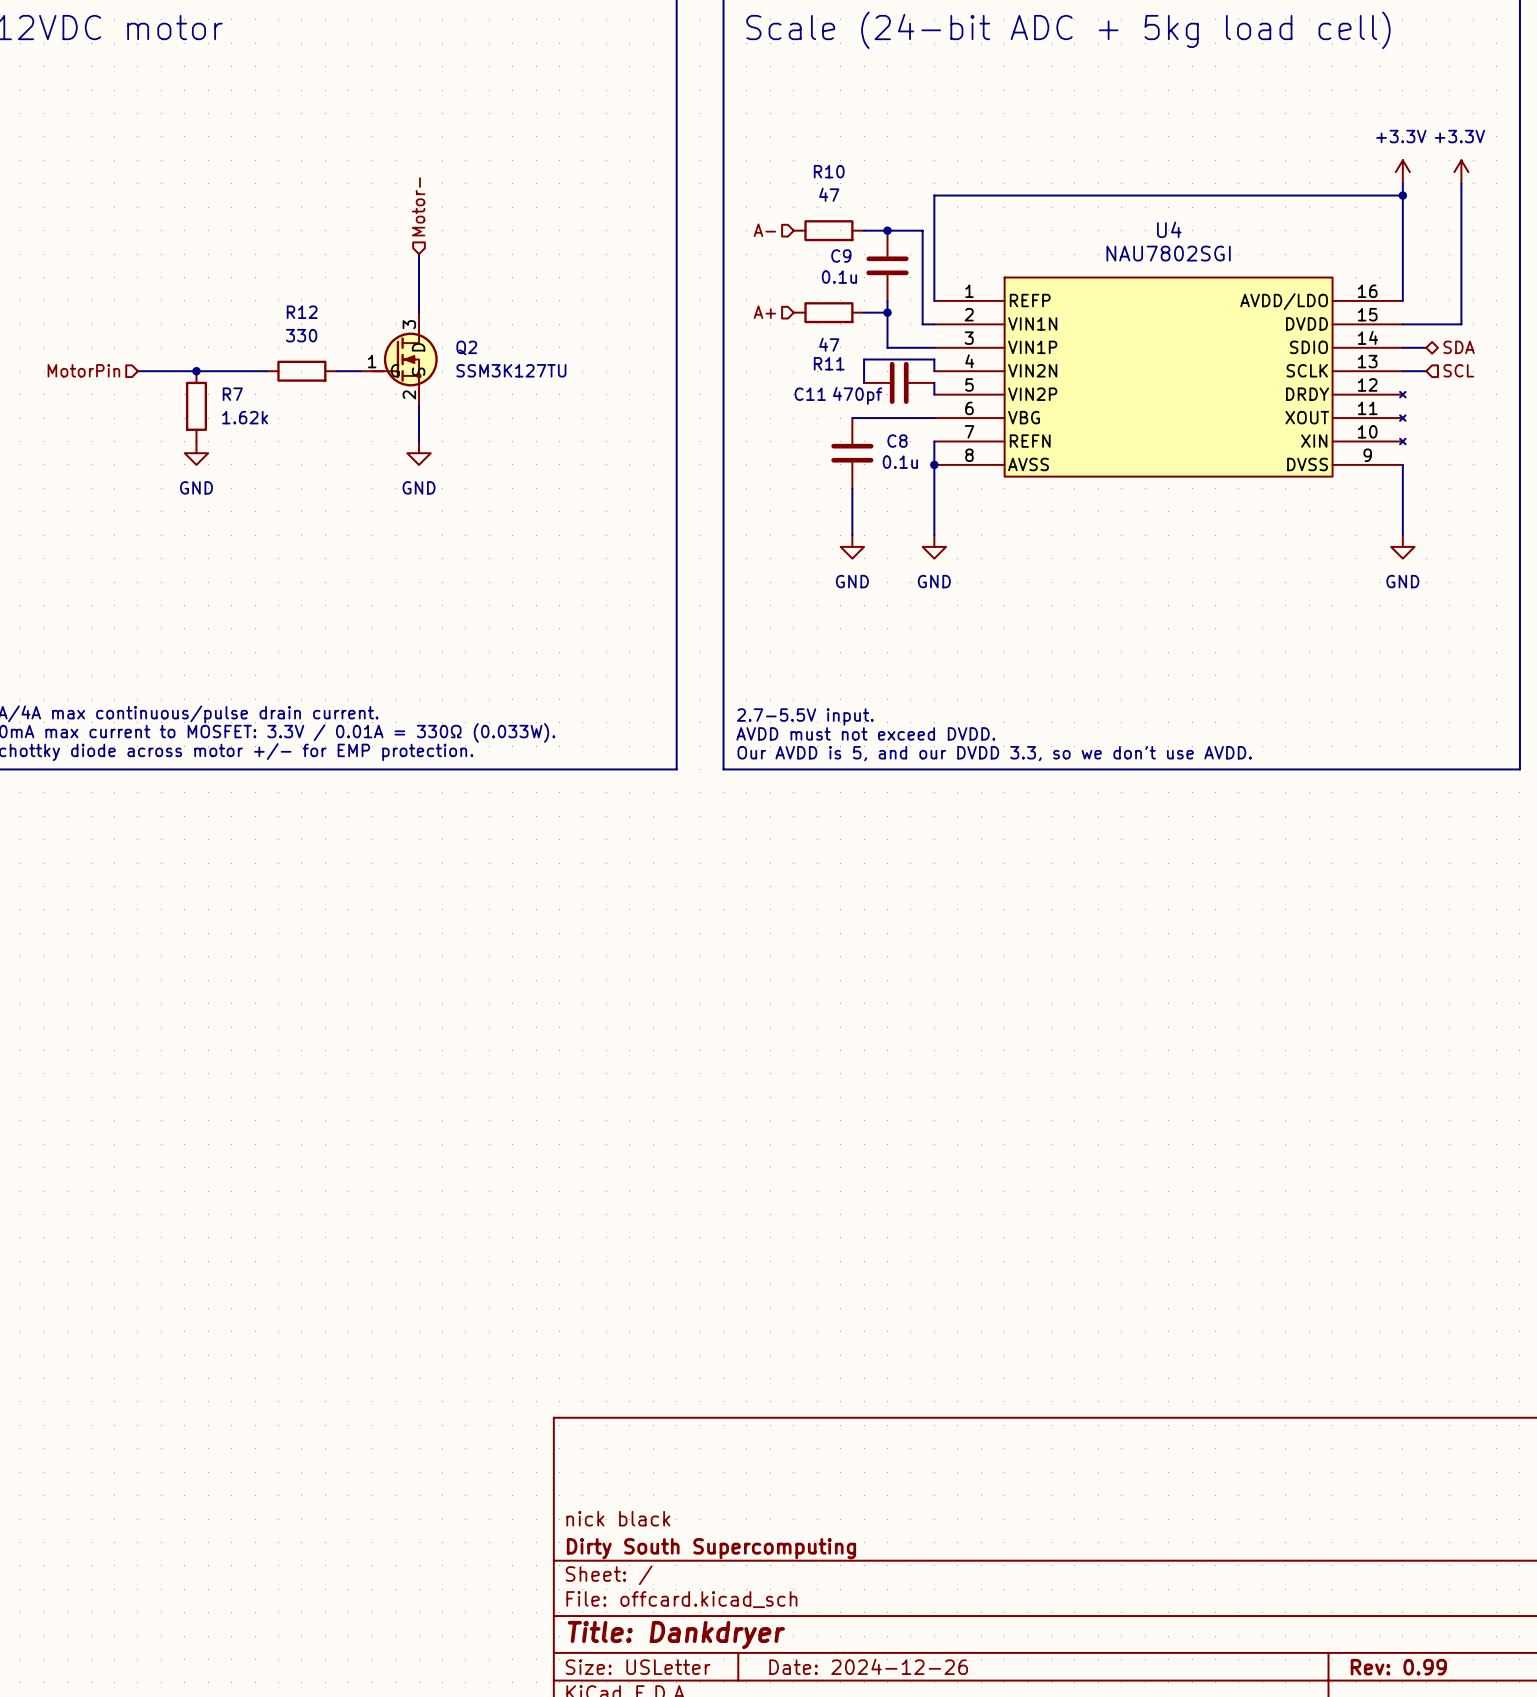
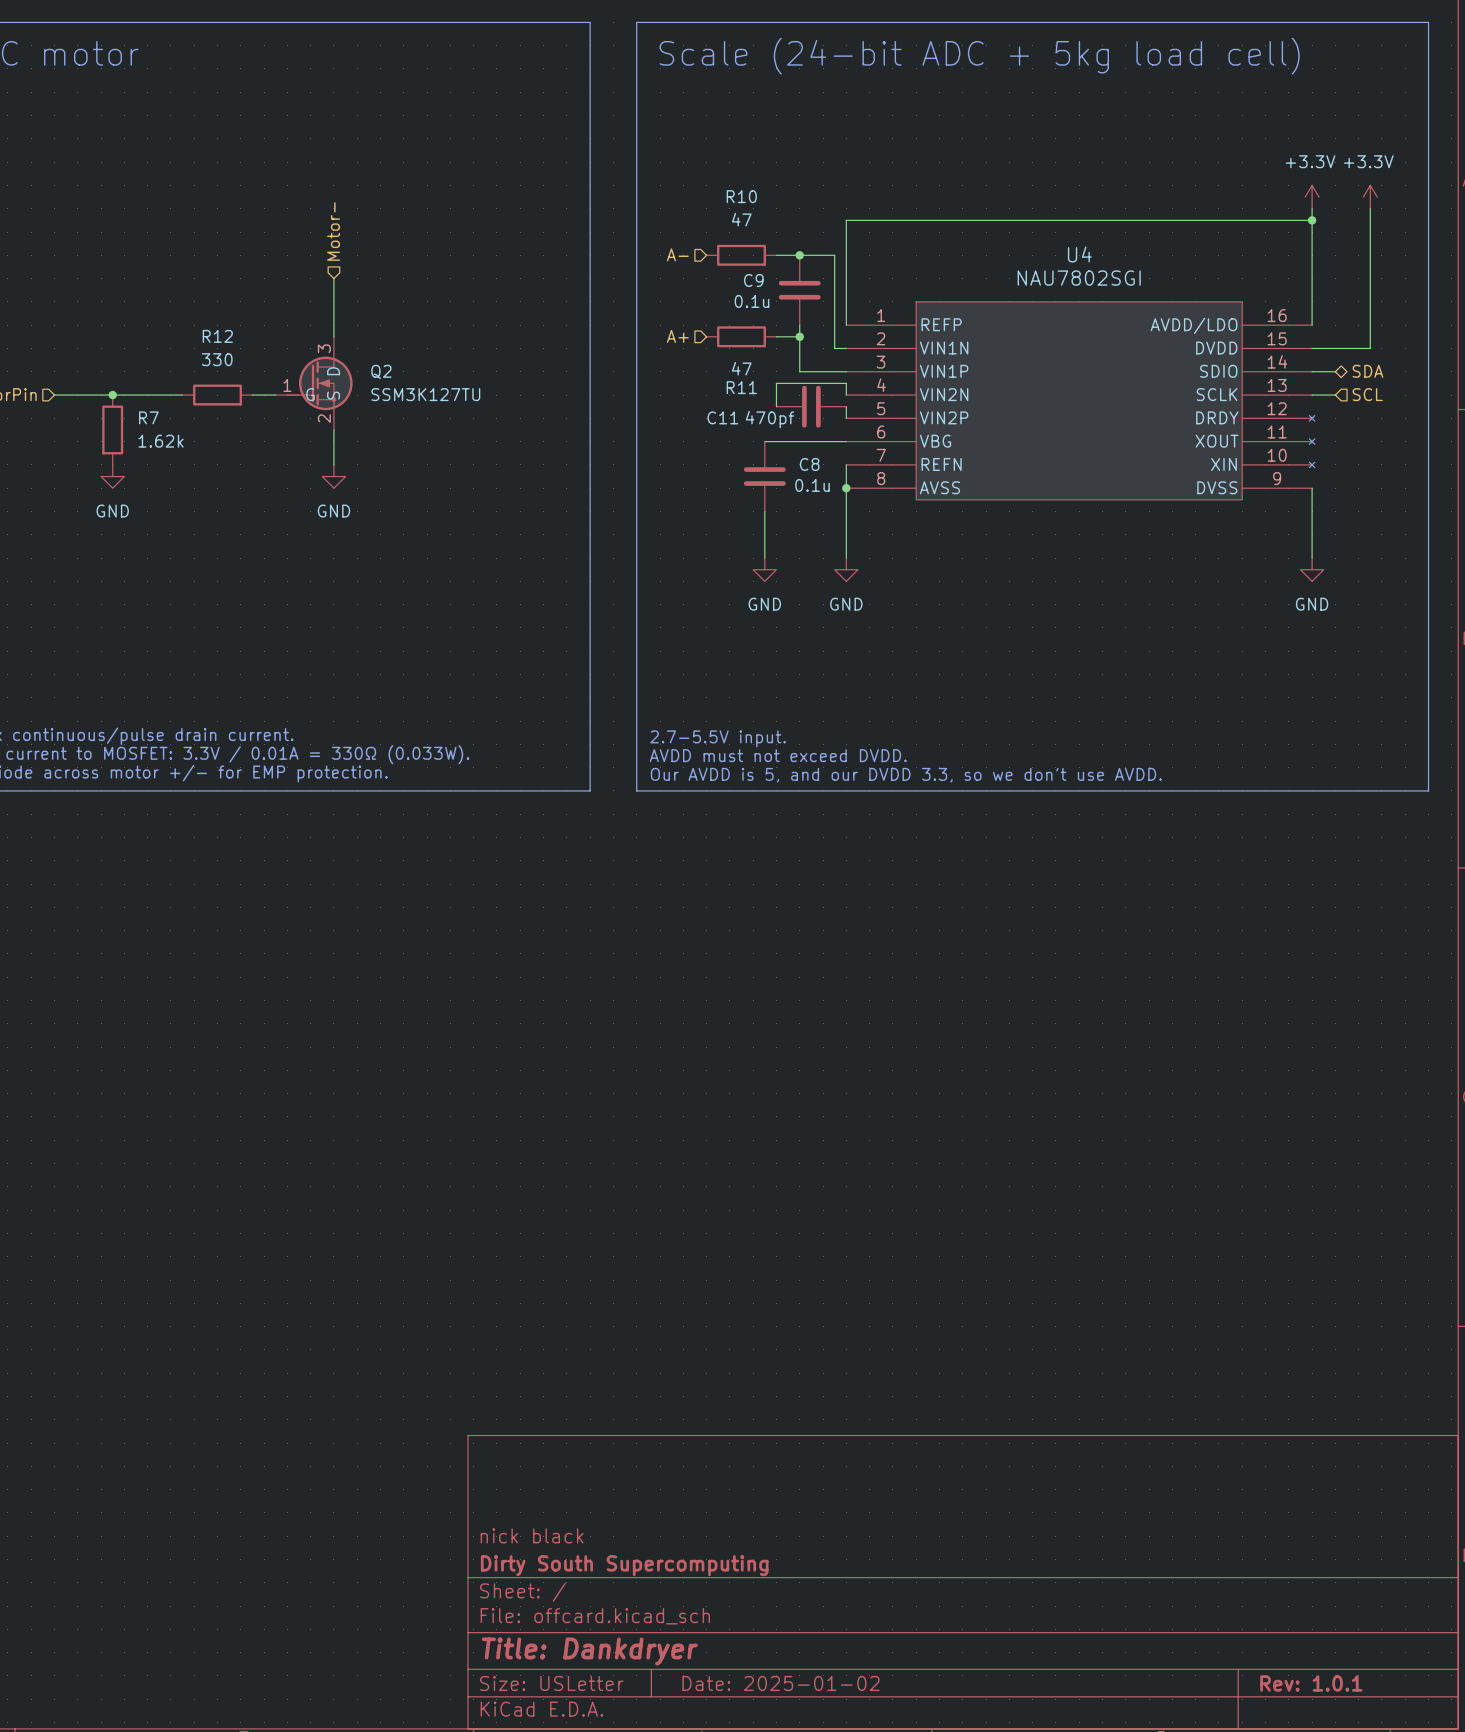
title block: Date: 2024-12-26 (868, 1666) -> Date: 2025-01-02 (780, 1683)
title block: Rev: 0.99 (1398, 1667) -> Rev: 1.0.1 (1311, 1683)

